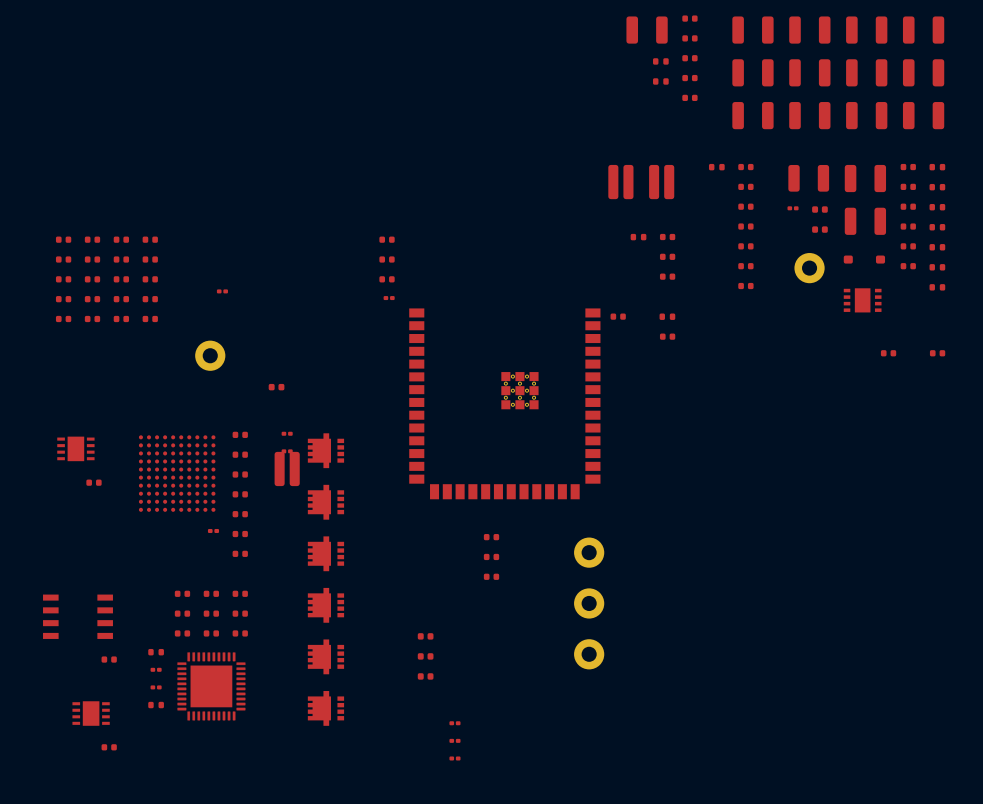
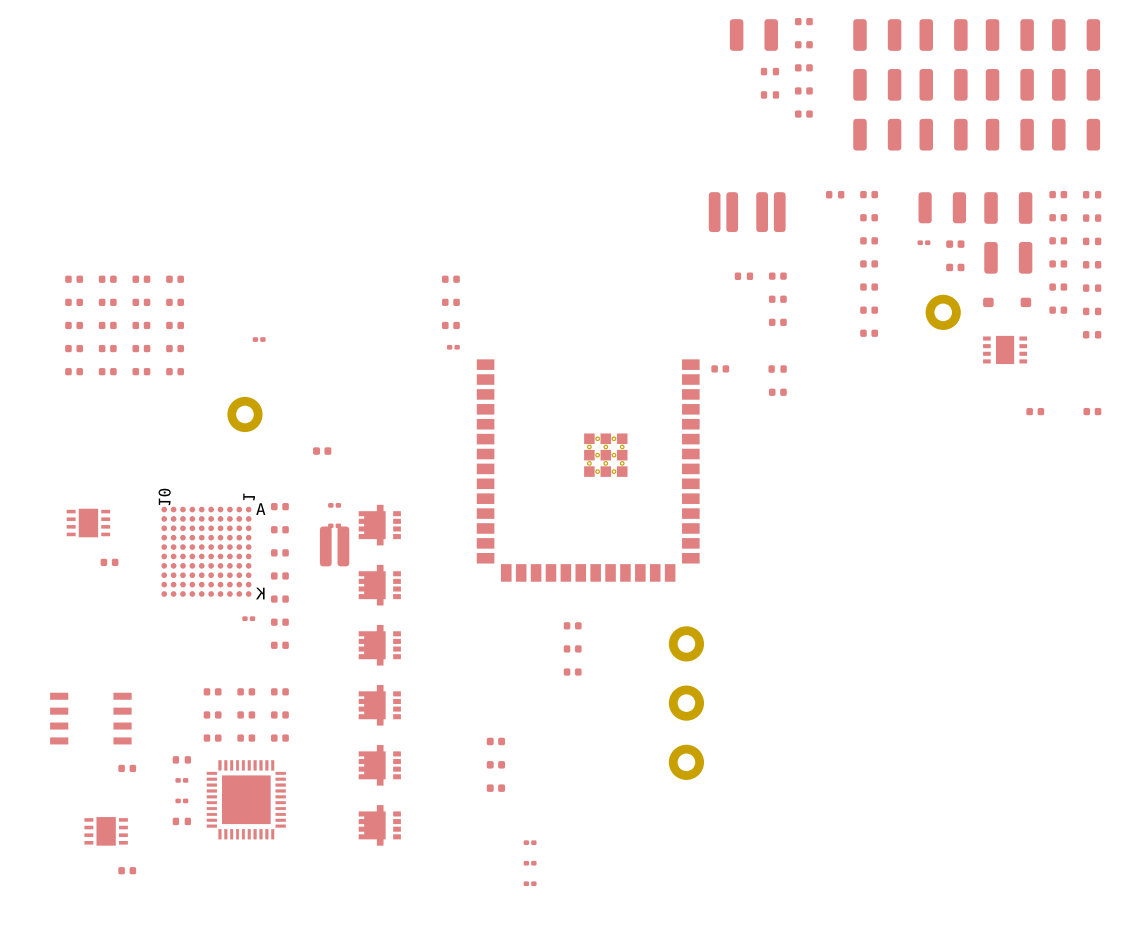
part footprint: [138, 435, 216, 512] -> [161, 506, 252, 597]

